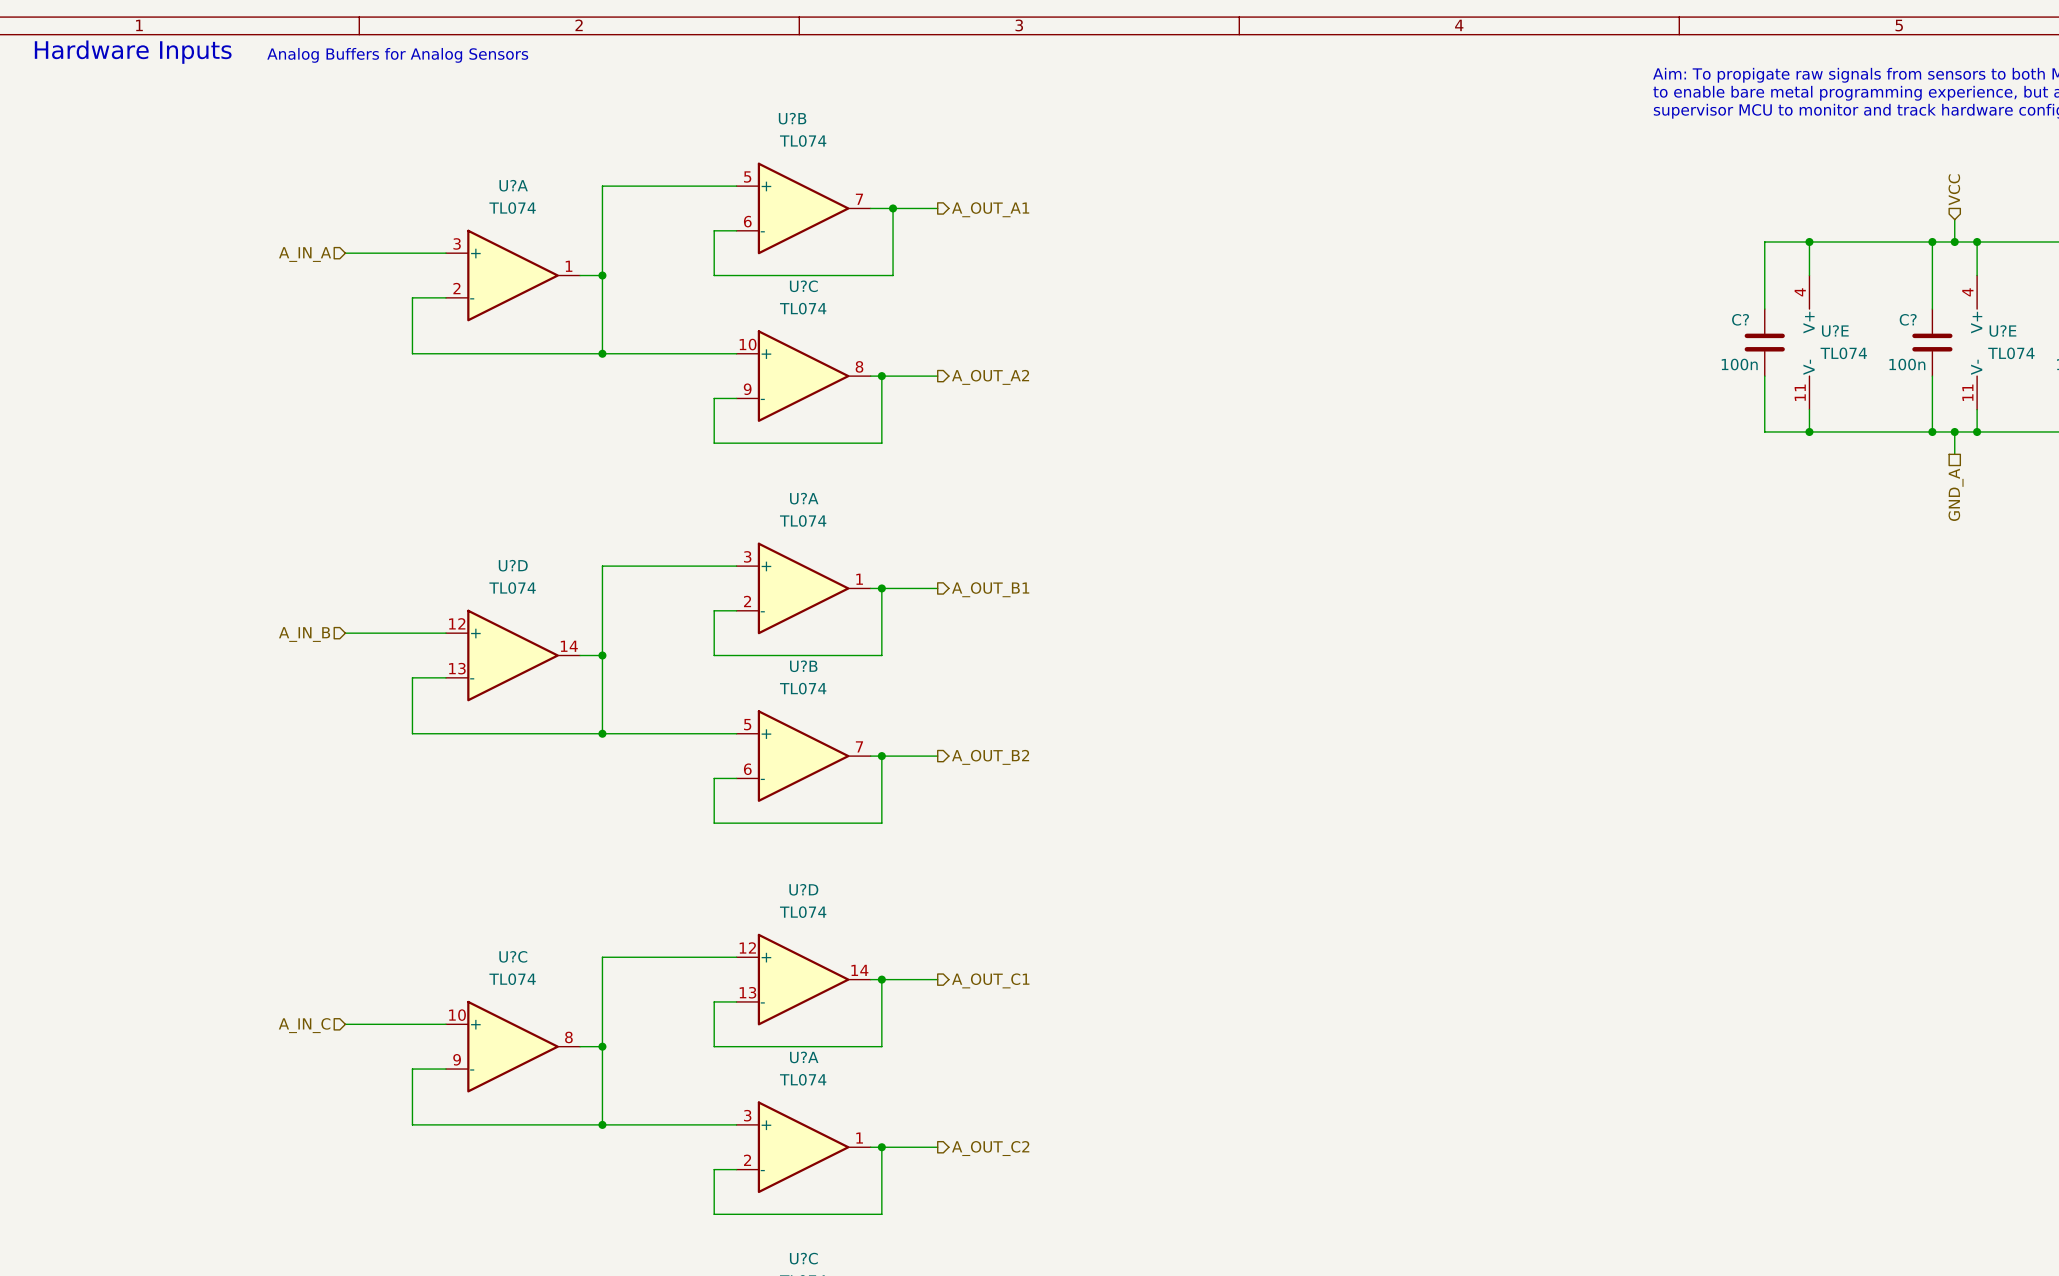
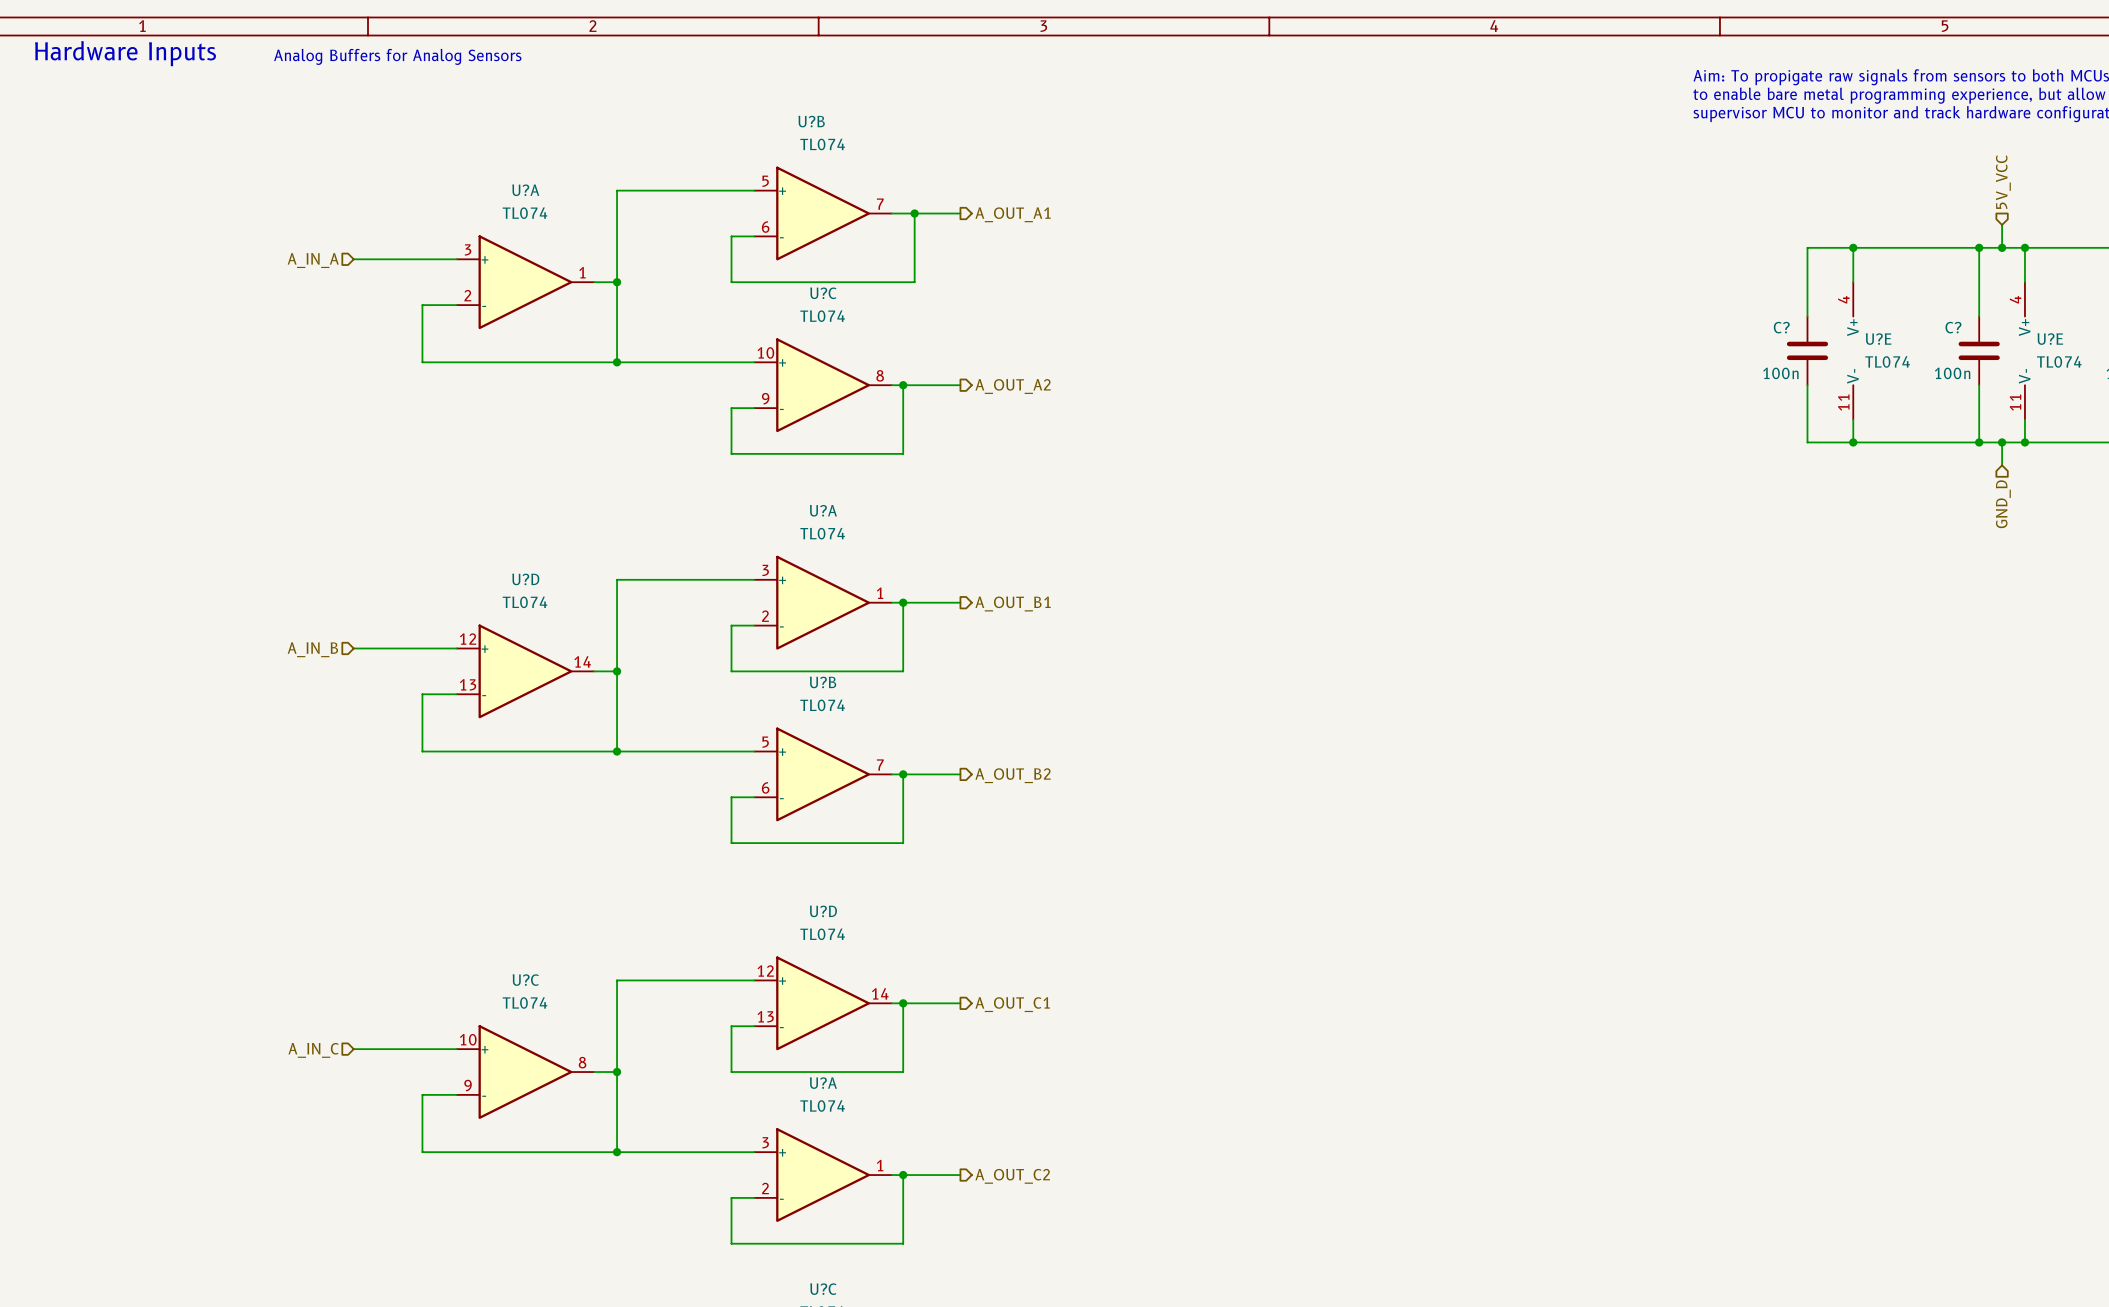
hierarchical label: VCC (1954, 189) -> 5V_VCC (2003, 182)
hierarchical label shape: passive (1956, 494) -> input (2003, 504)
hierarchical label: GND_A (1956, 494) -> GND_D (2003, 504)

